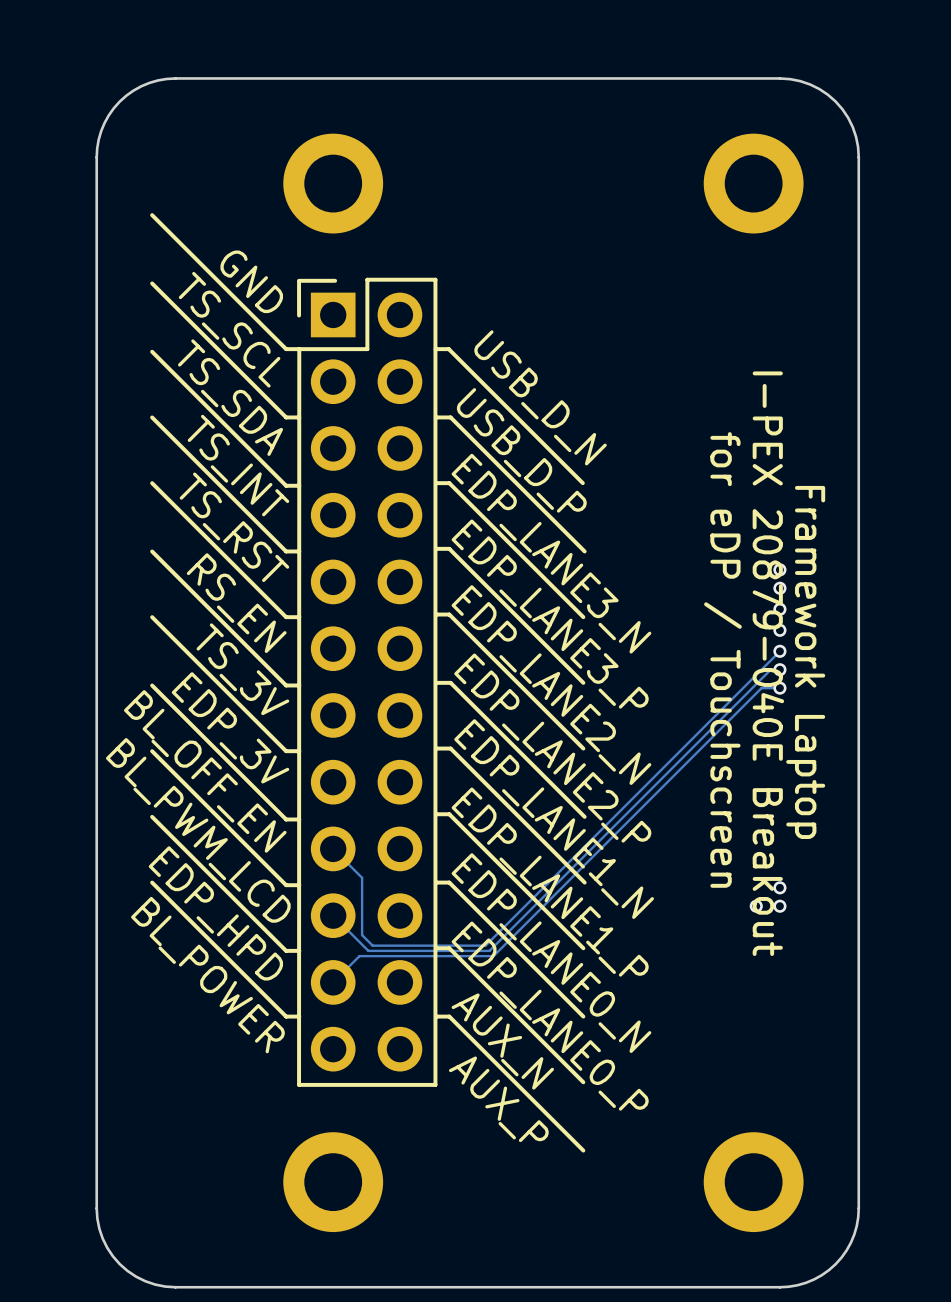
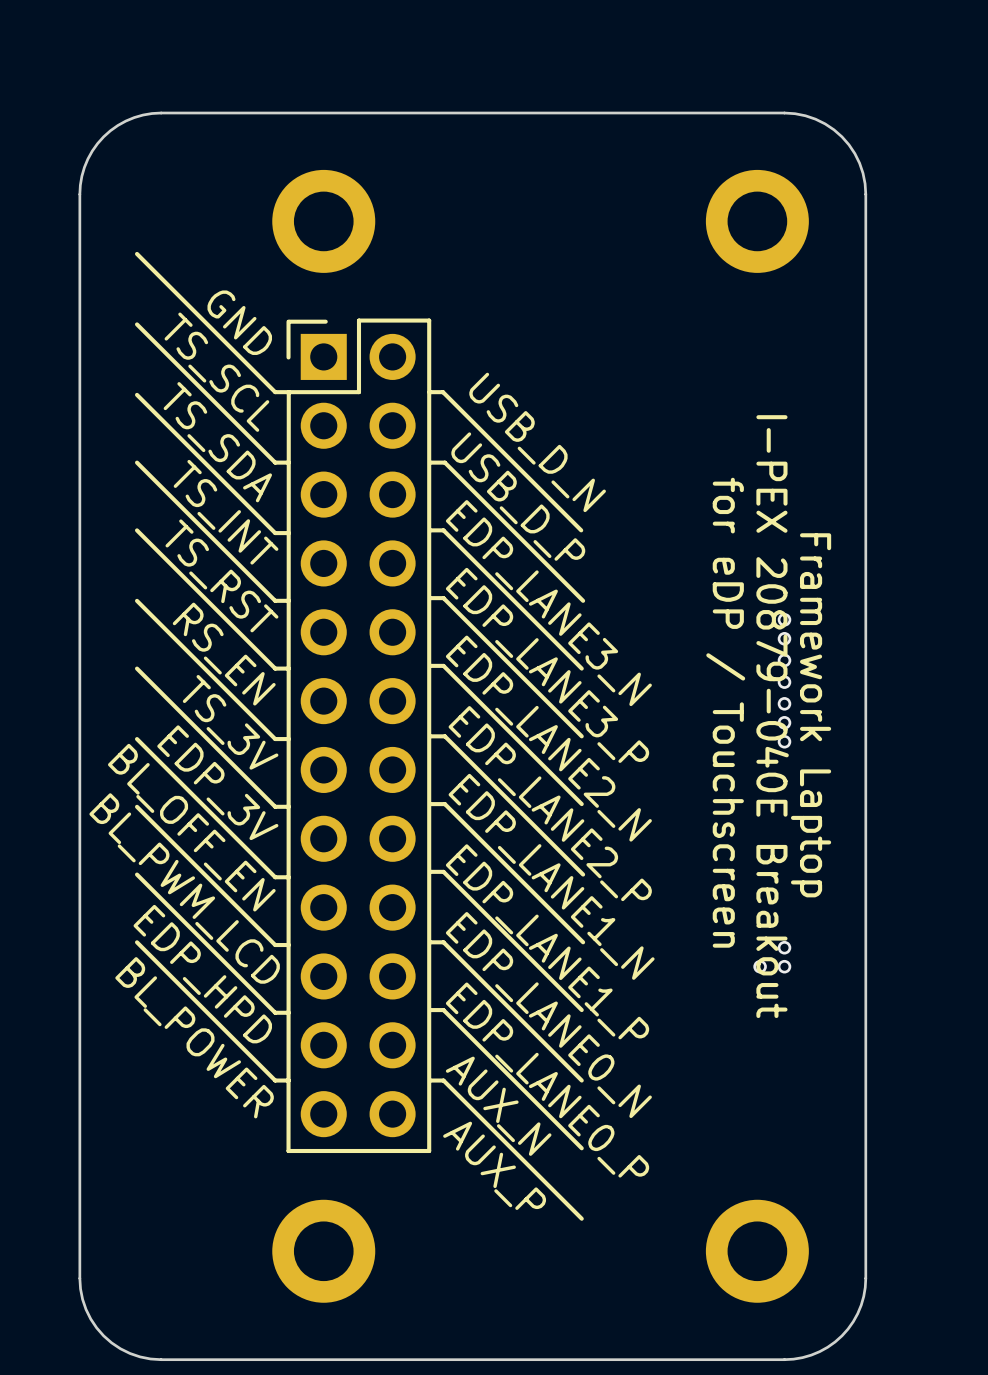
track: (779, 651) (485, 945) (372, 945) (362, 935) (362, 877) (333, 848) -> none
track: (779, 669) (770, 669) (489, 950) (368, 950) (333, 915) -> none
track: (779, 688) (761, 688) (493, 956) (359, 956) (333, 982) -> none

